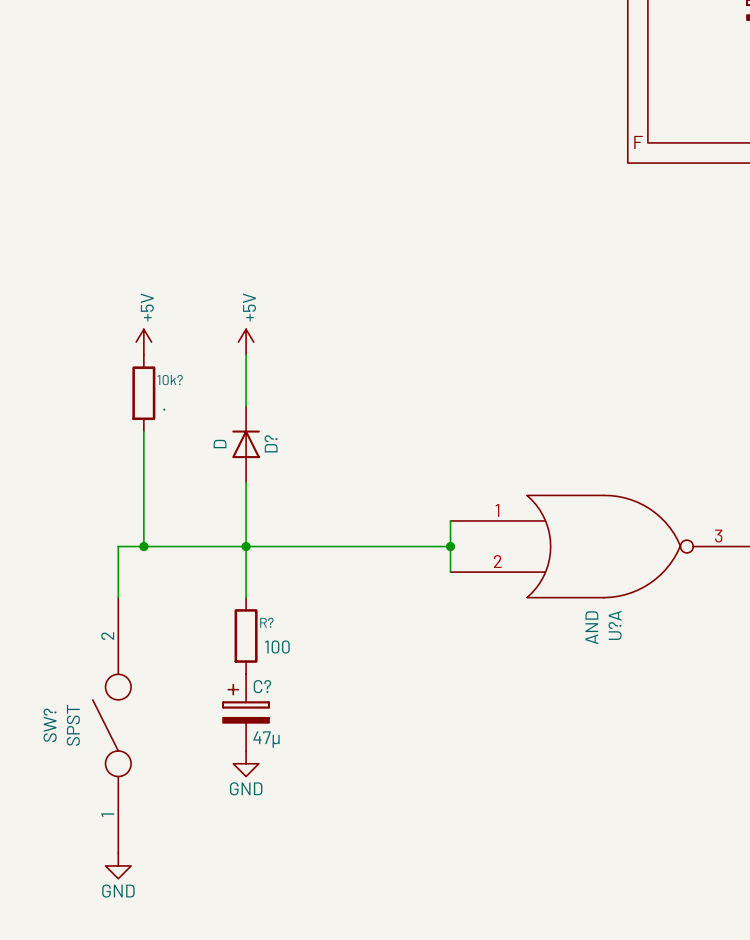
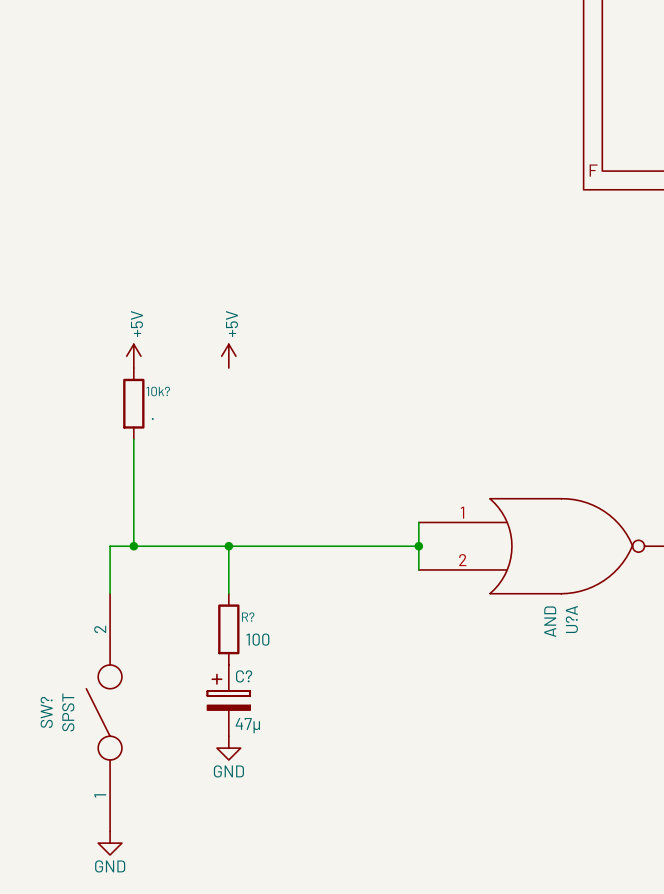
wire: (246, 354) (246, 405) -> none
D?: D (246, 444) -> none
wire: (246, 482) (246, 546) -> none

